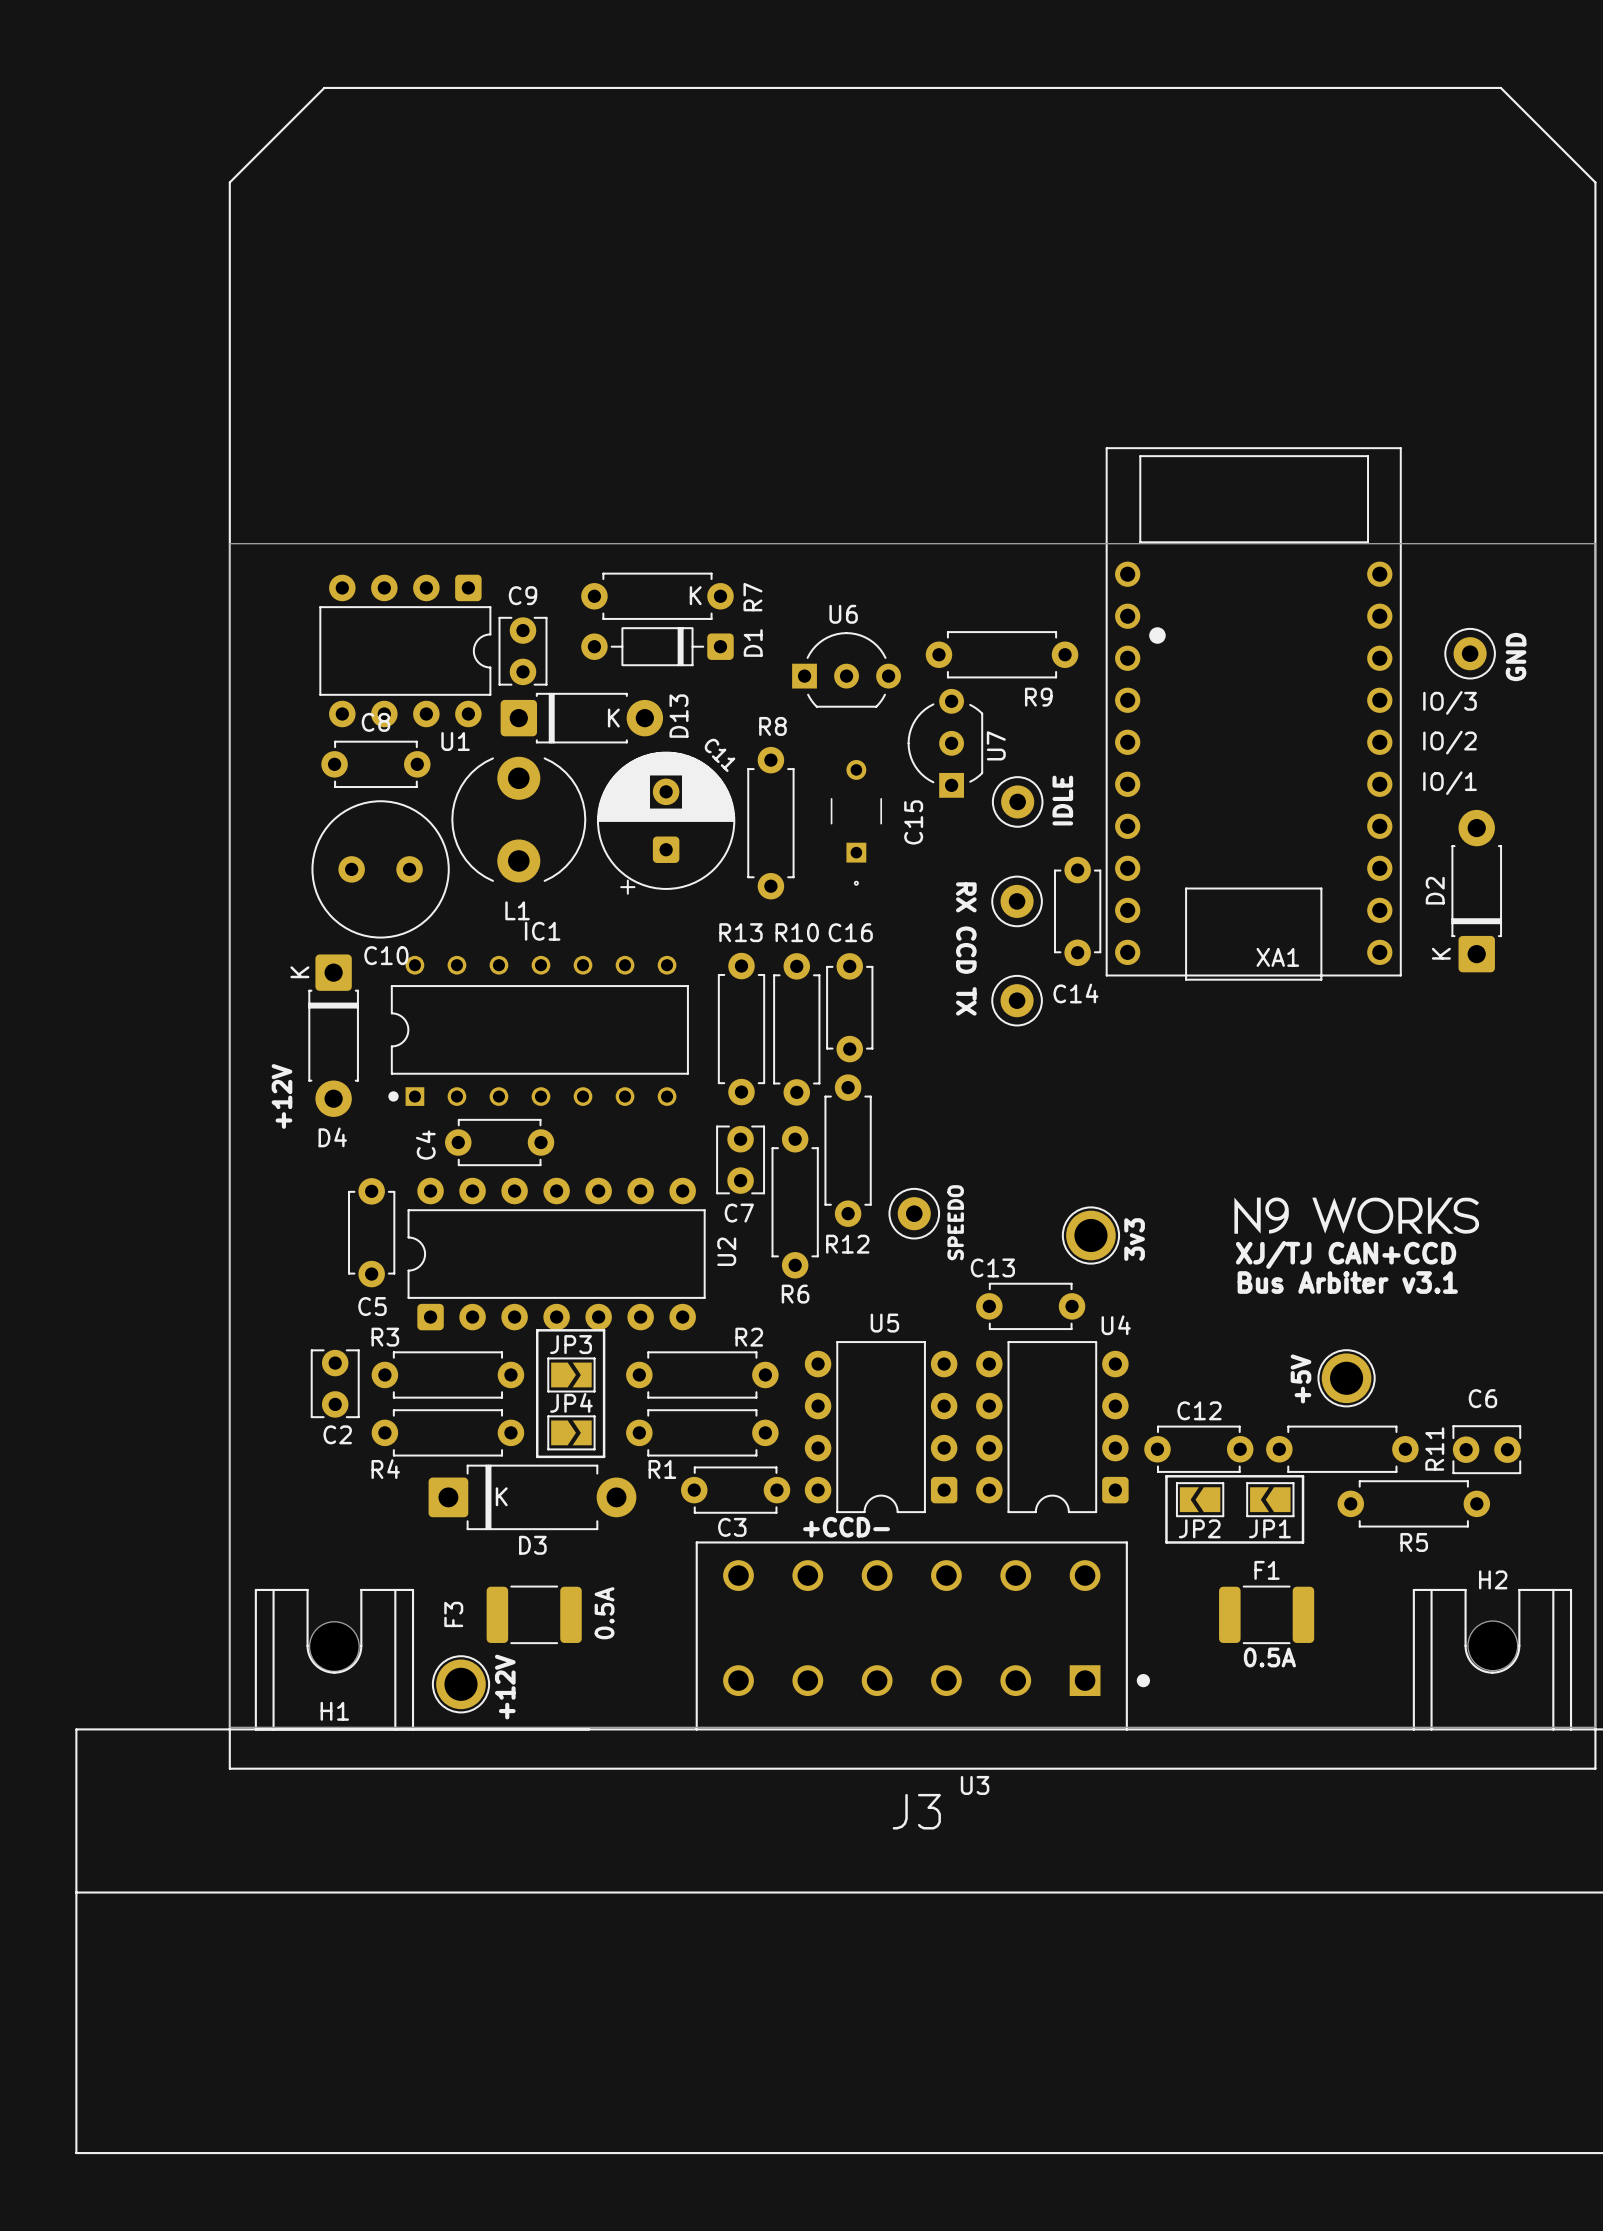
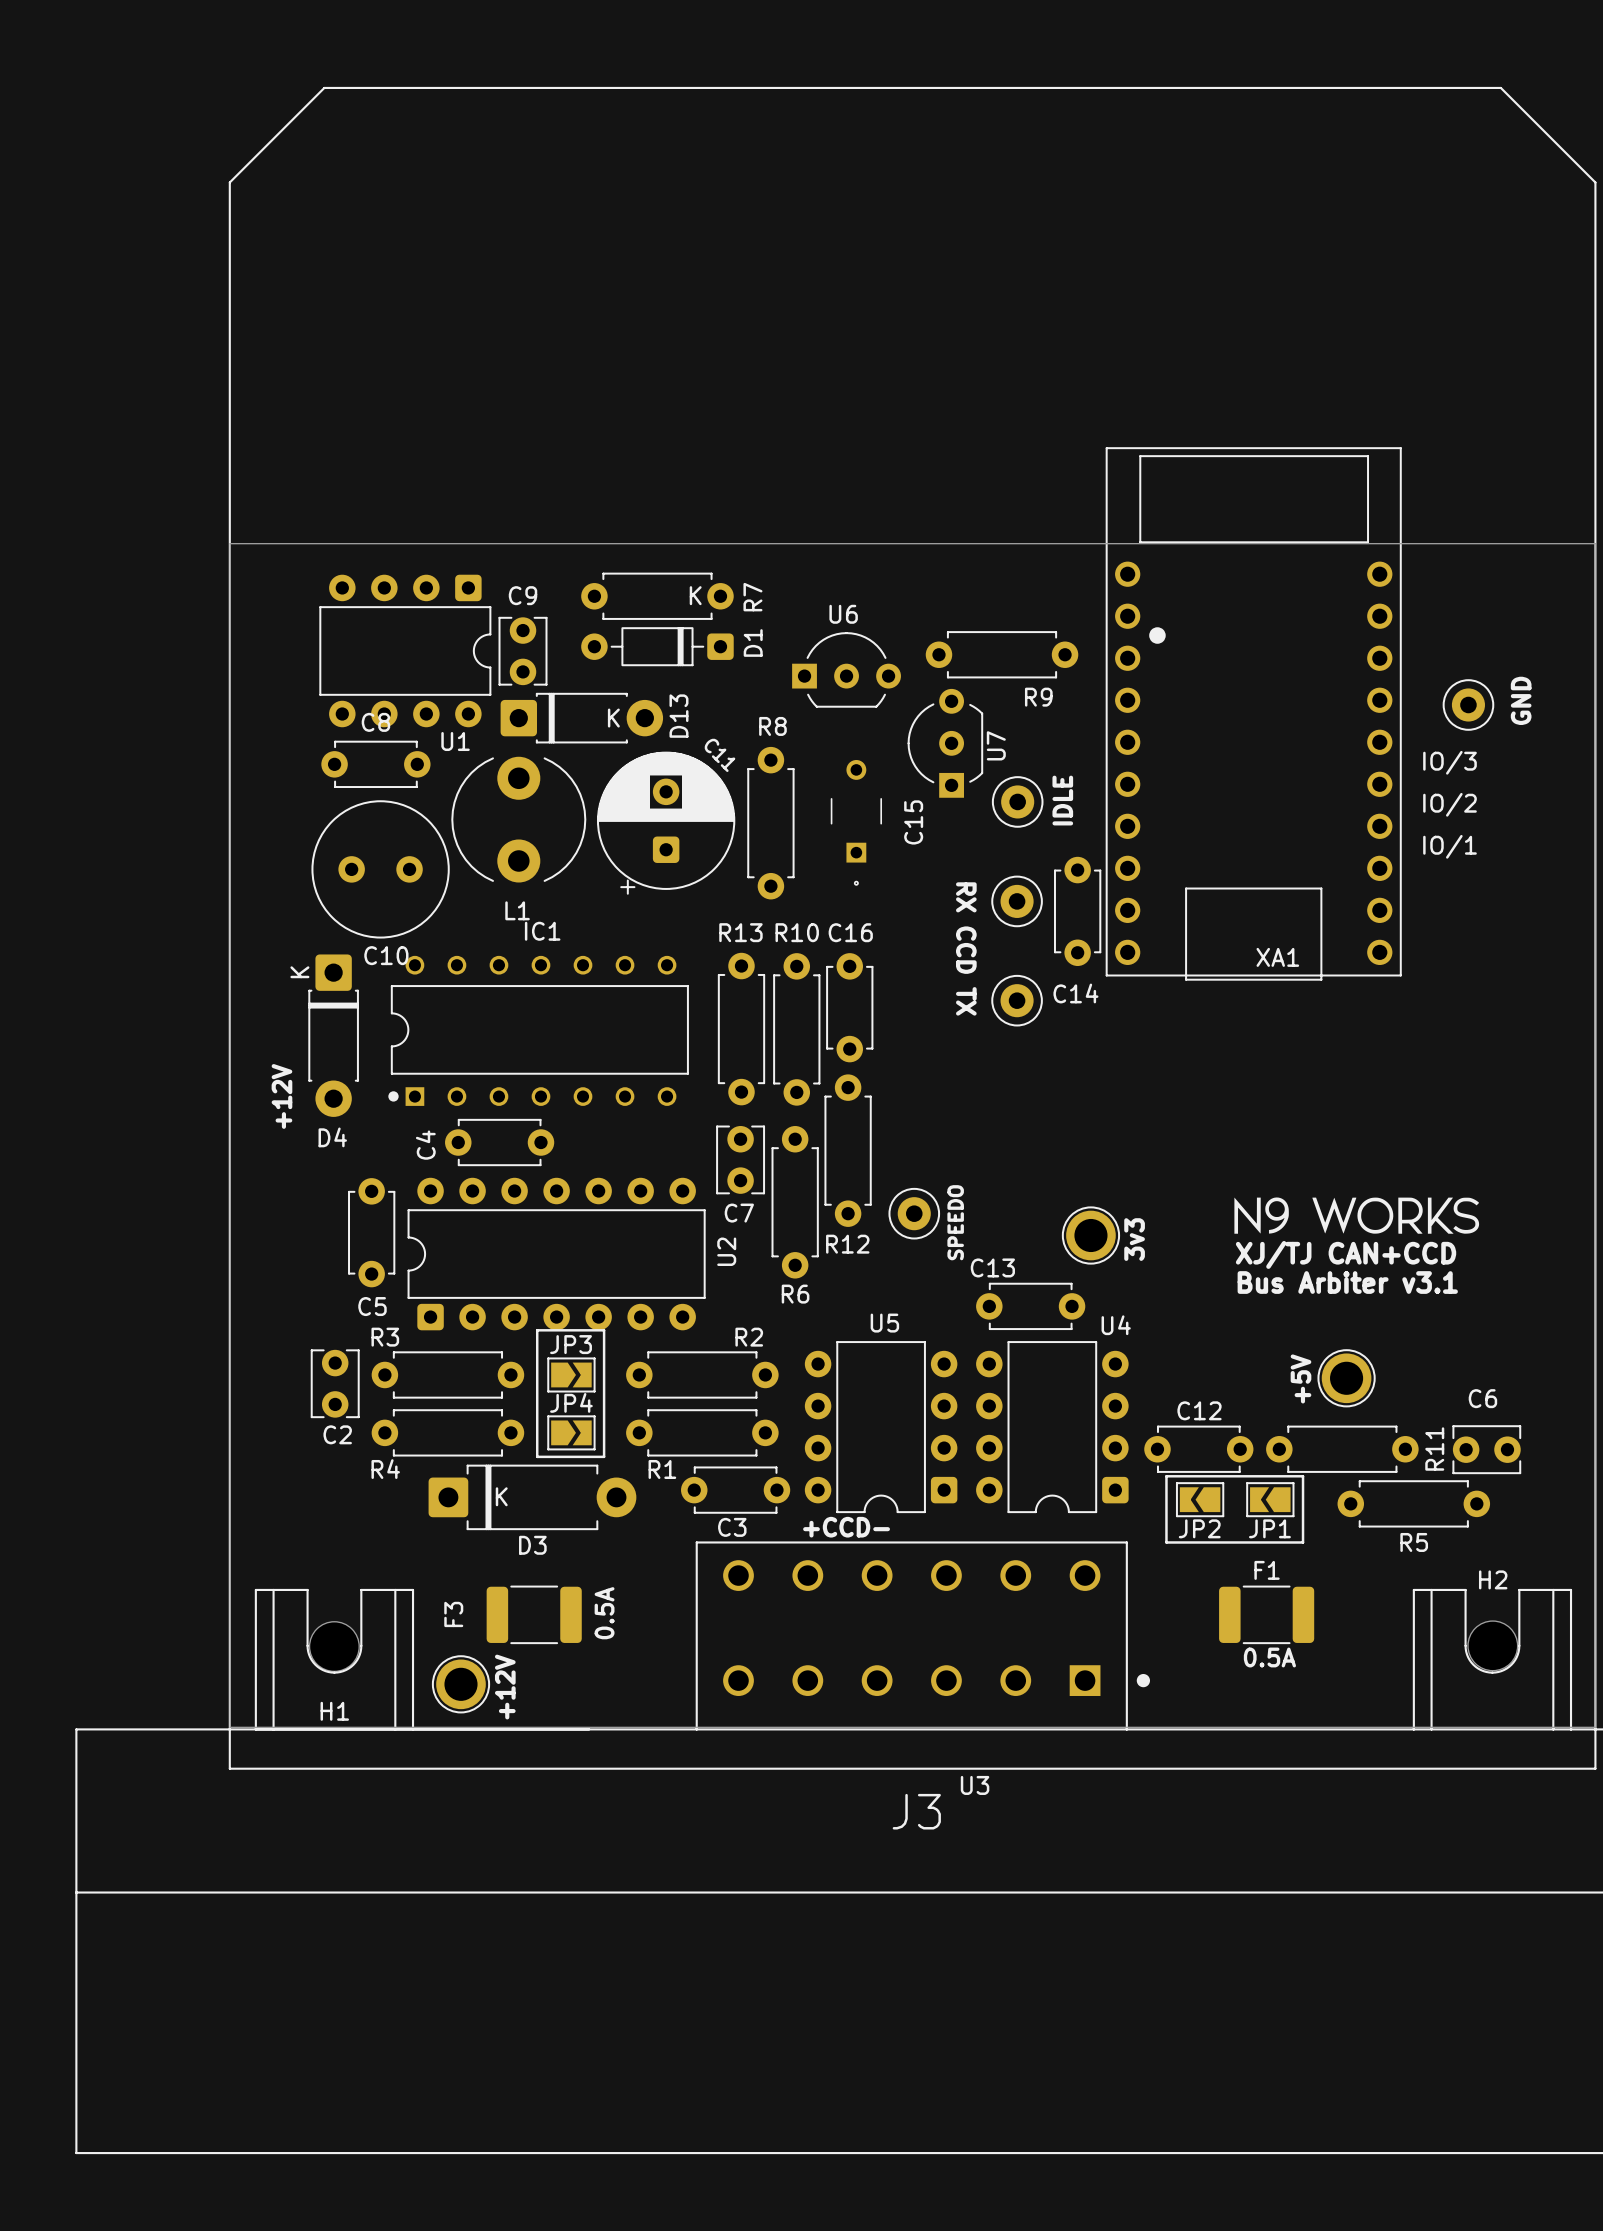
part position: (1470, 653) -> (1468, 704)
text position: GND (1516, 657) -> GND (1521, 700)
text position: IO/3 (1450, 702) -> IO/3 (1450, 762)
text position: IO/2 (1450, 742) -> IO/2 (1450, 804)
text position: IO/1 (1450, 783) -> IO/1 (1450, 846)
D2: (1476, 891) -> none

